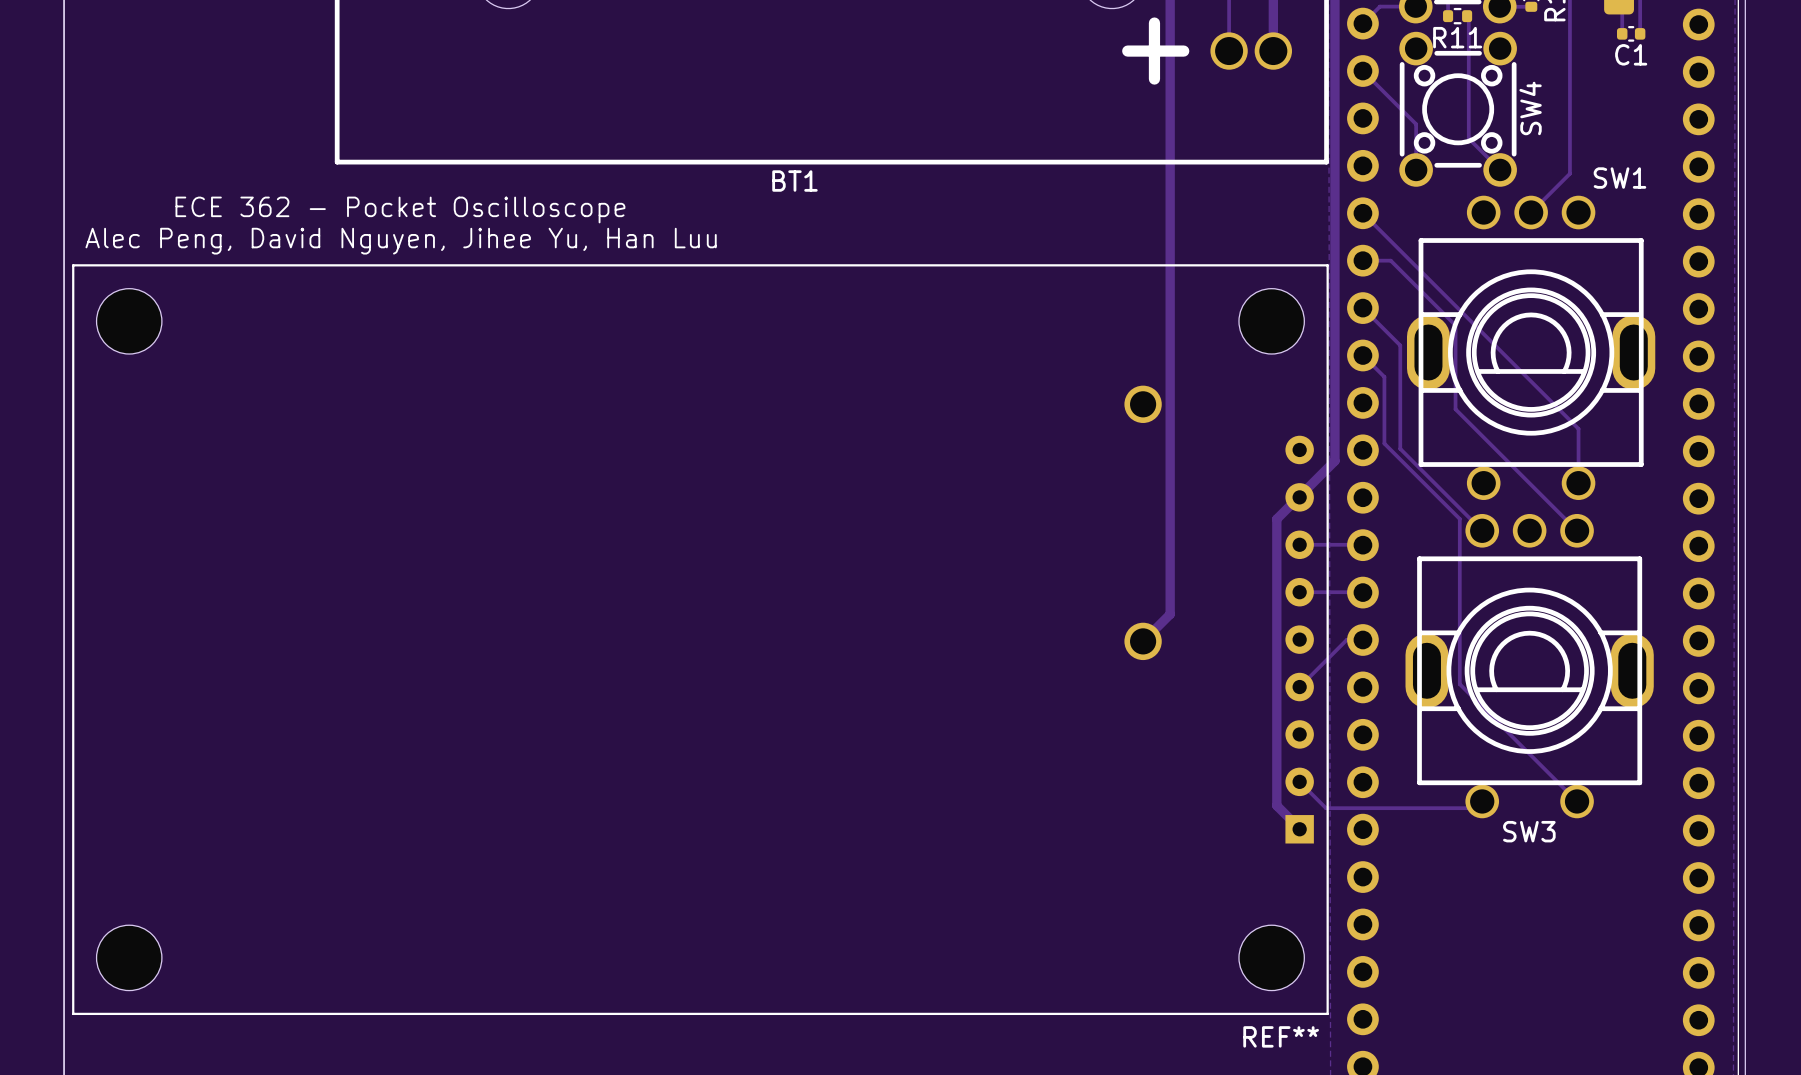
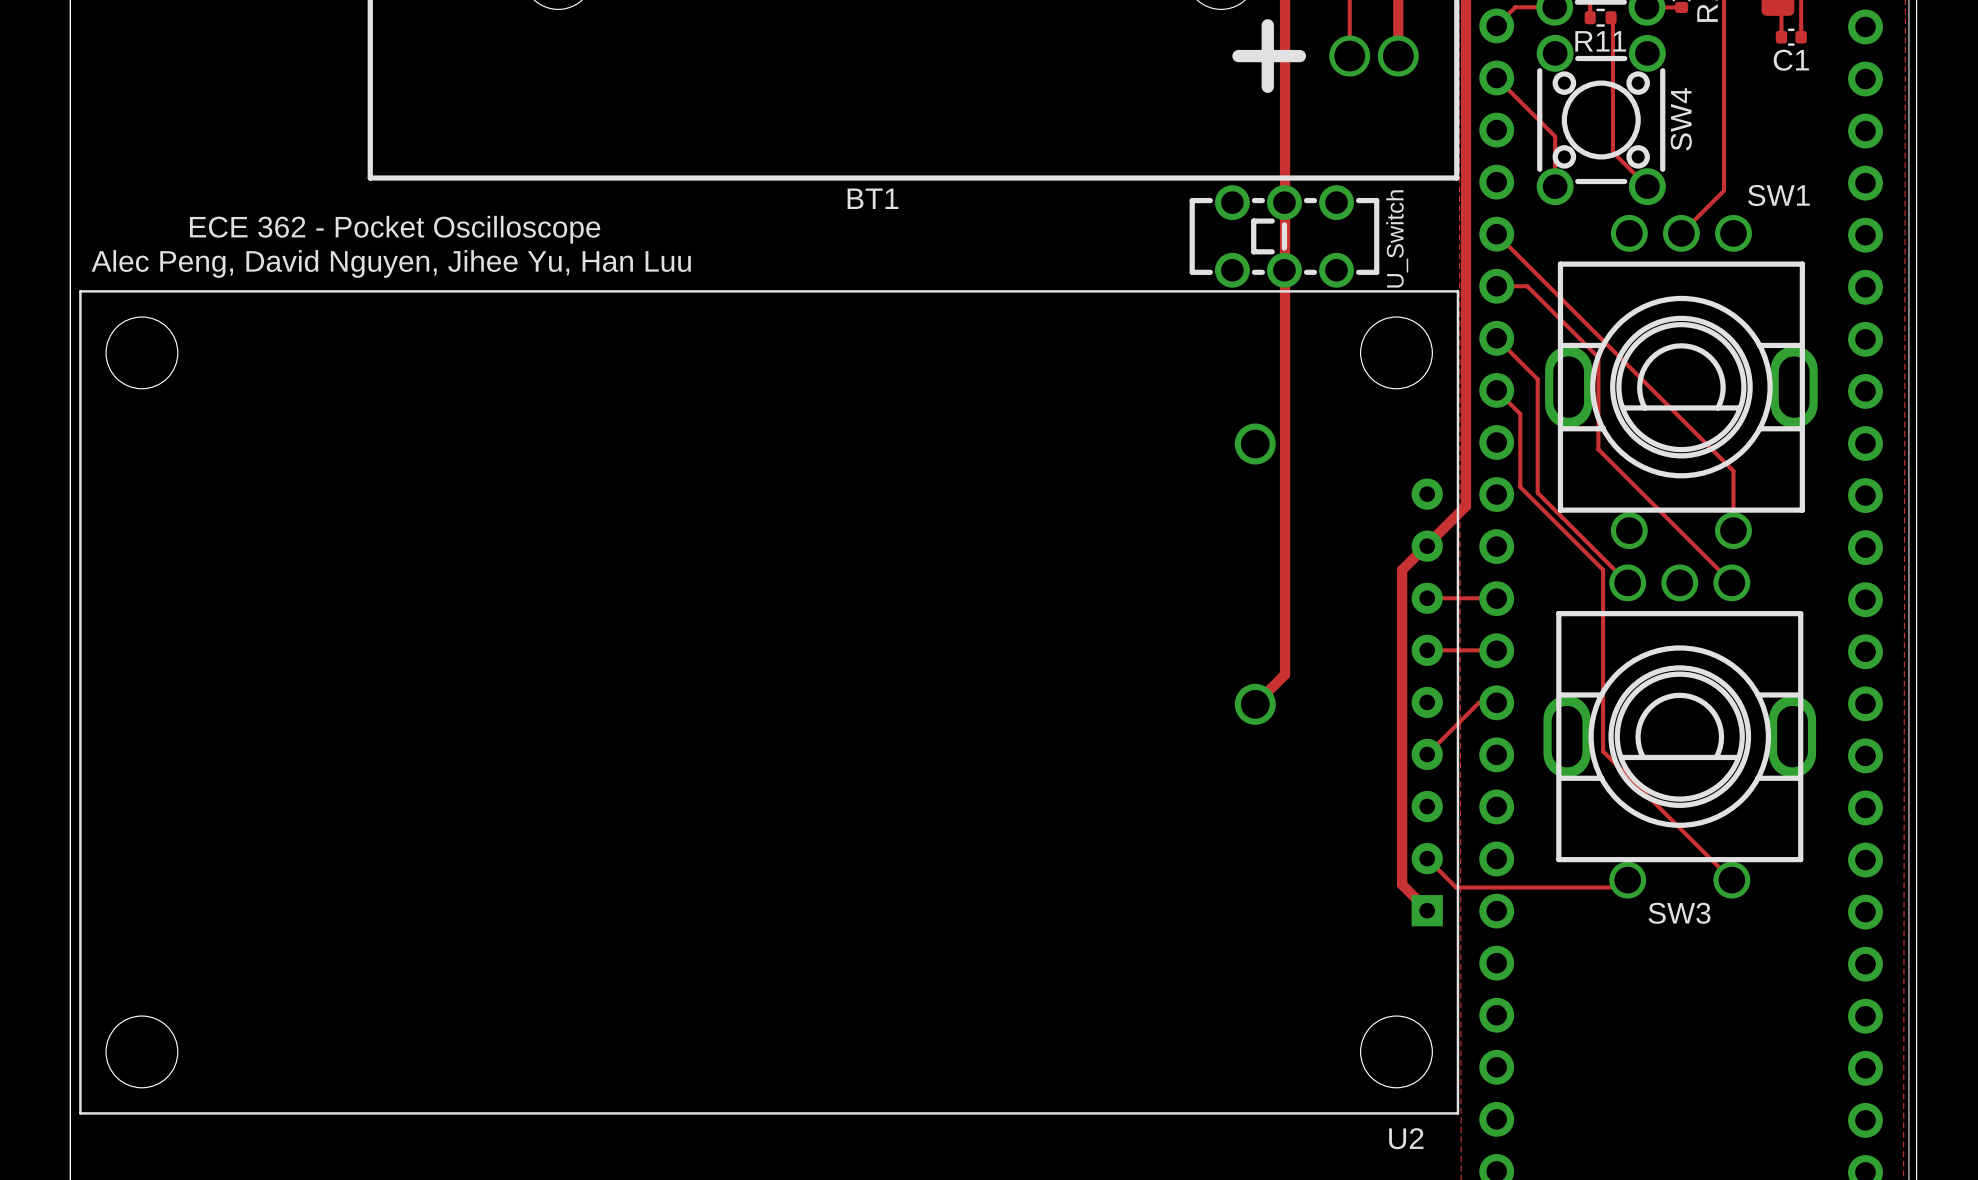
U_Switch: none -> (1284, 236)
REF** name: REF** (1281, 1036) -> U2 (1406, 1138)

